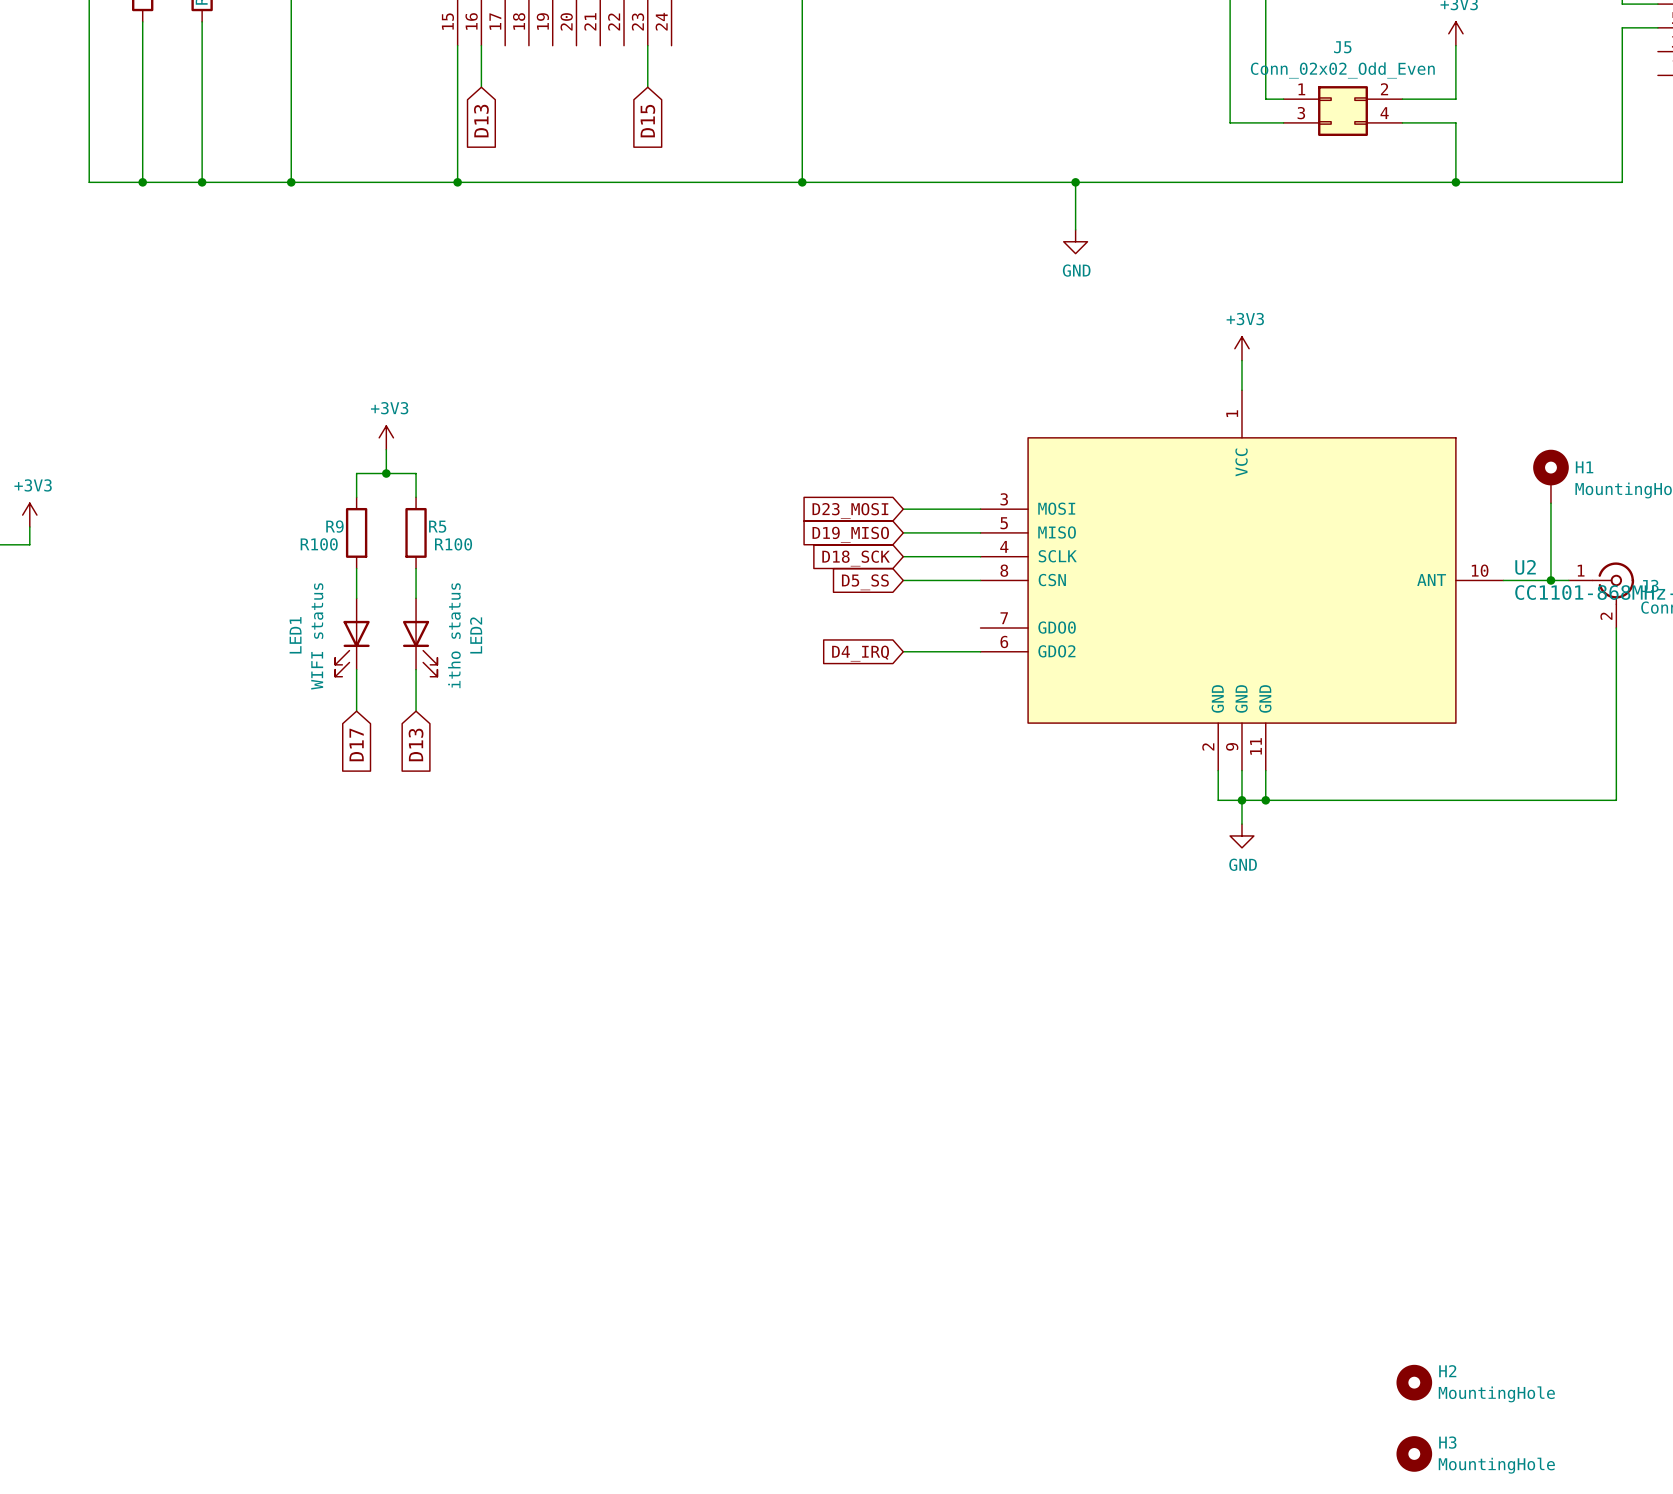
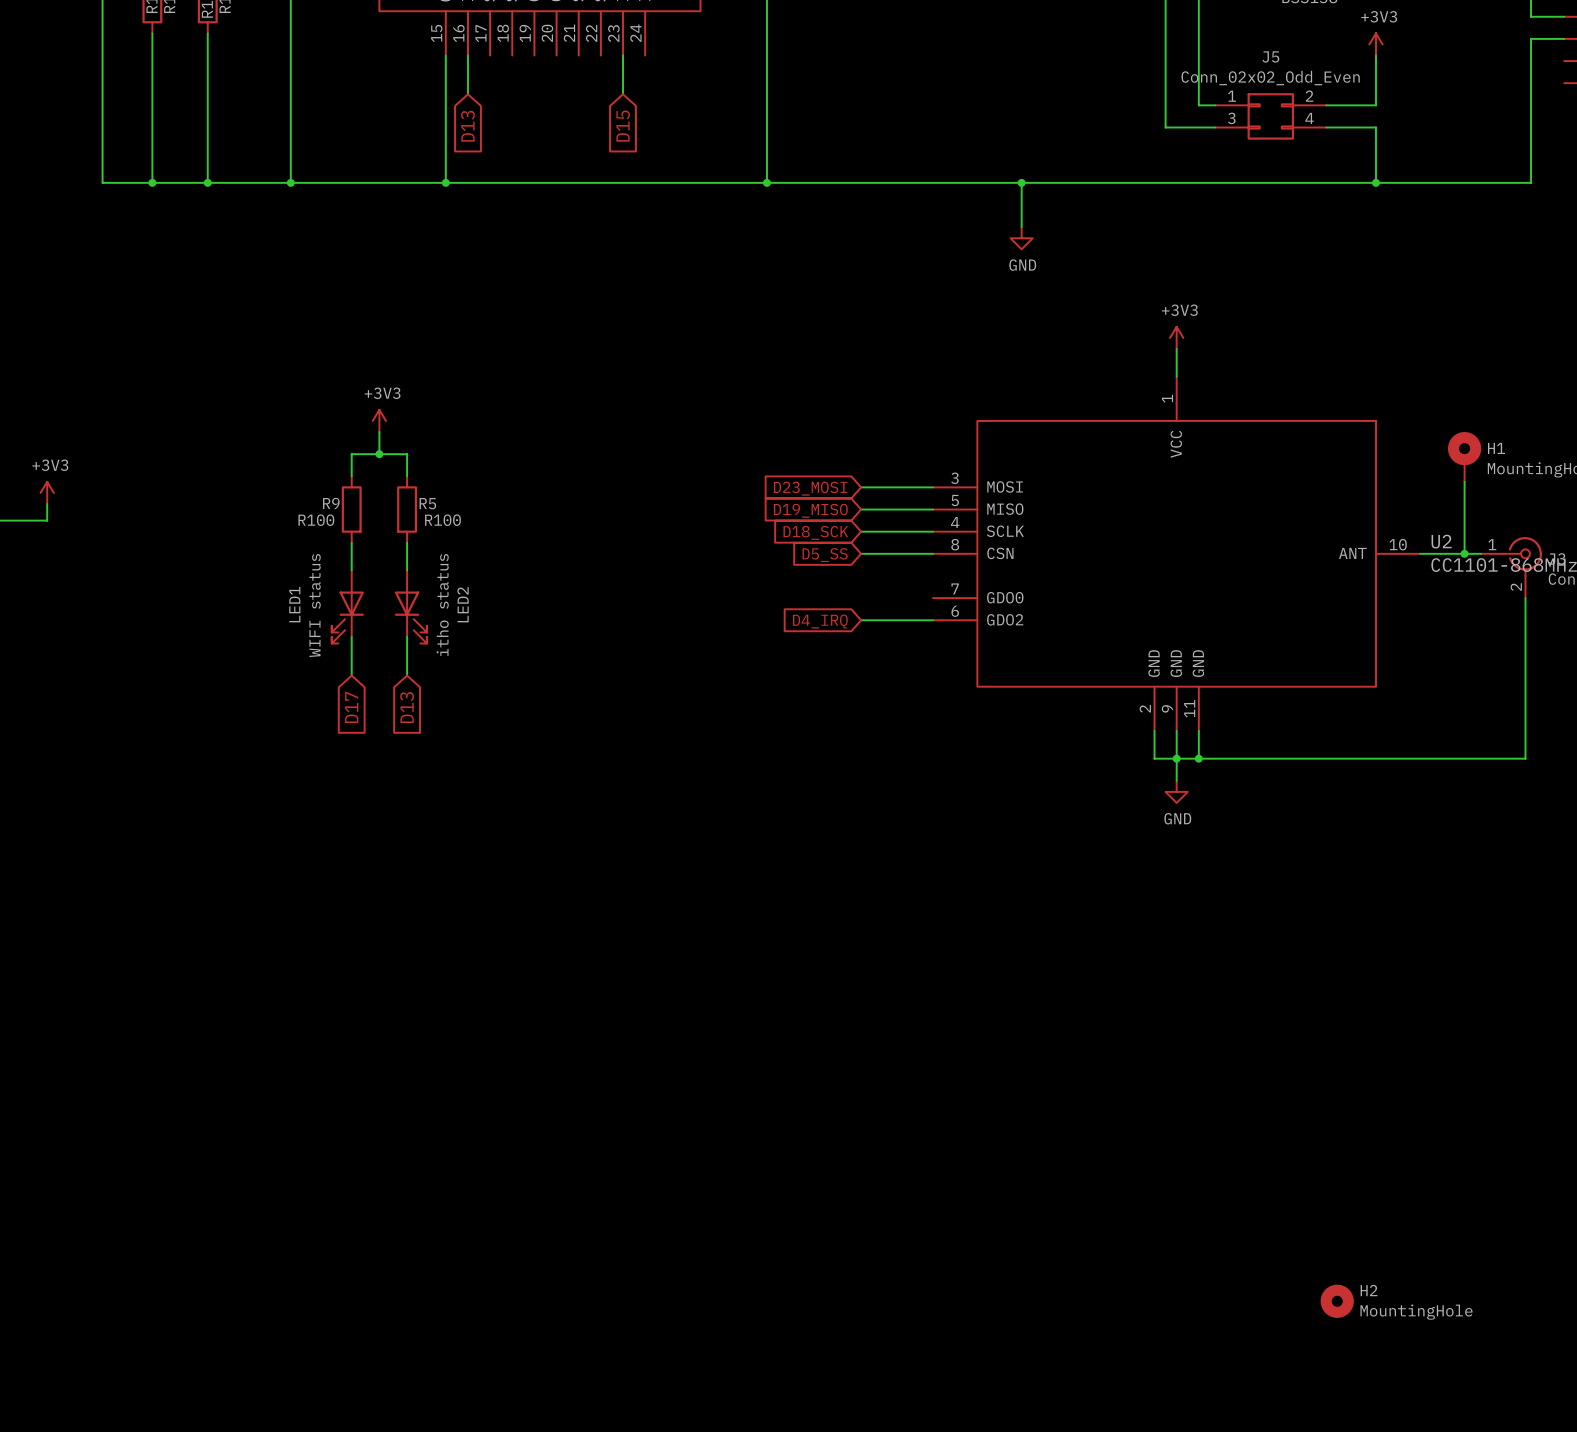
H3: MountingHole (1414, 1453) -> none

